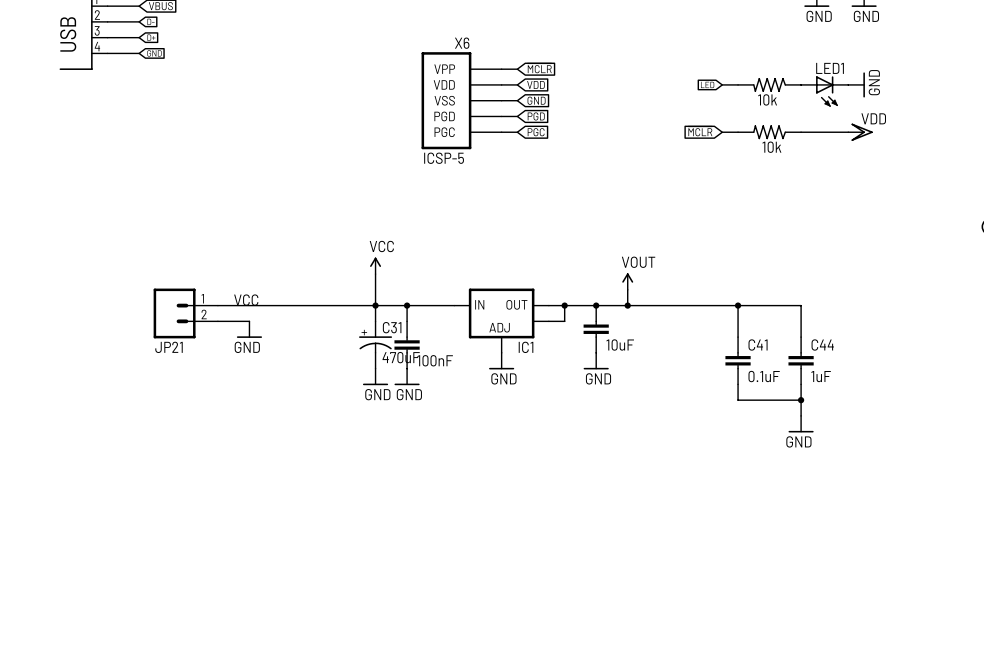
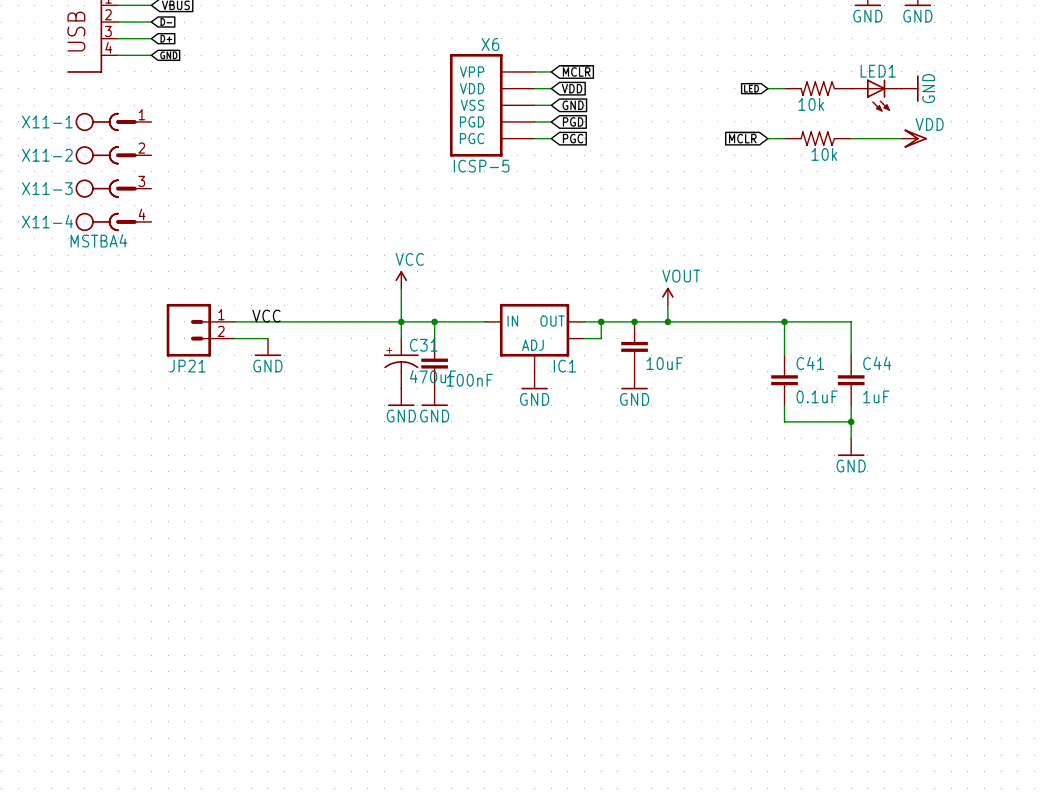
X11-1: none -> (113, 121)
X11-2: none -> (113, 155)
X11-3: none -> (113, 188)
X11-4: none -> MSTBA4 (113, 221)

